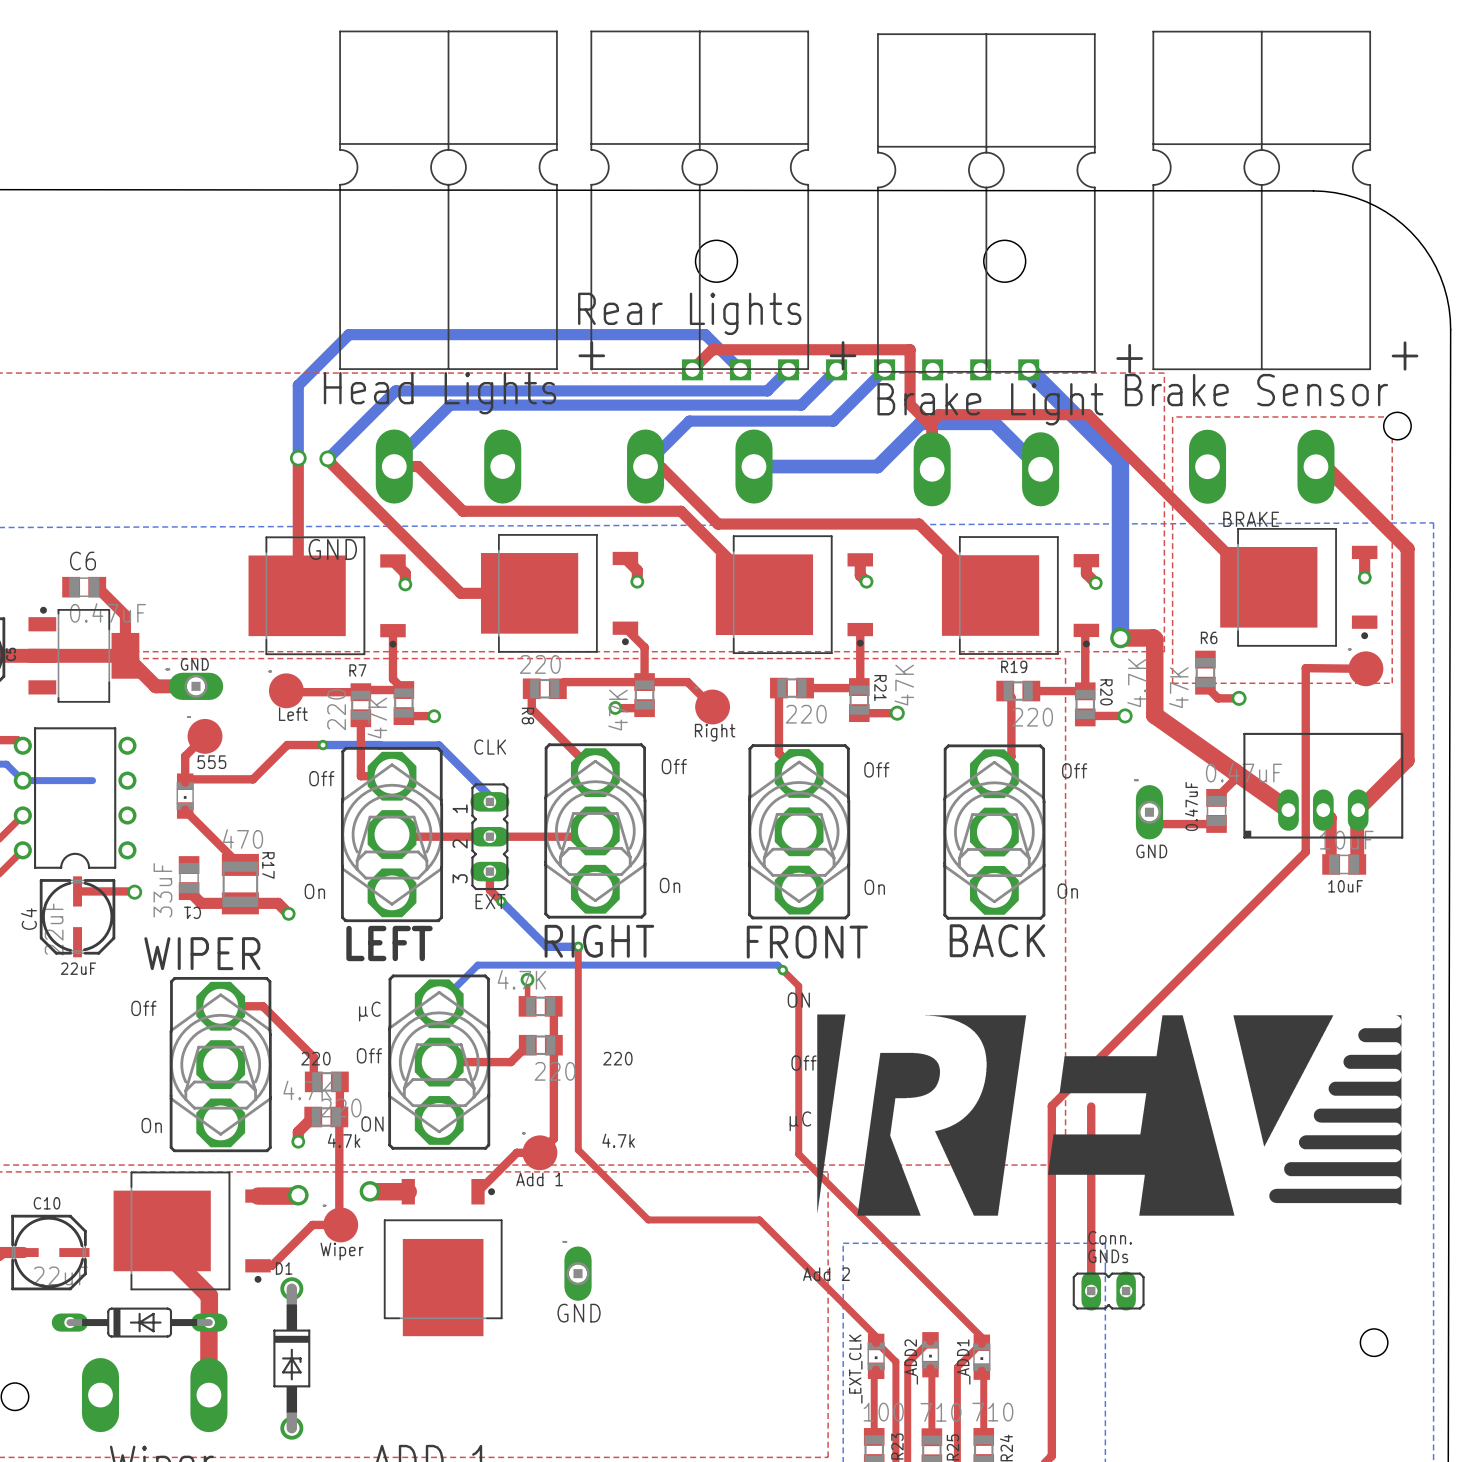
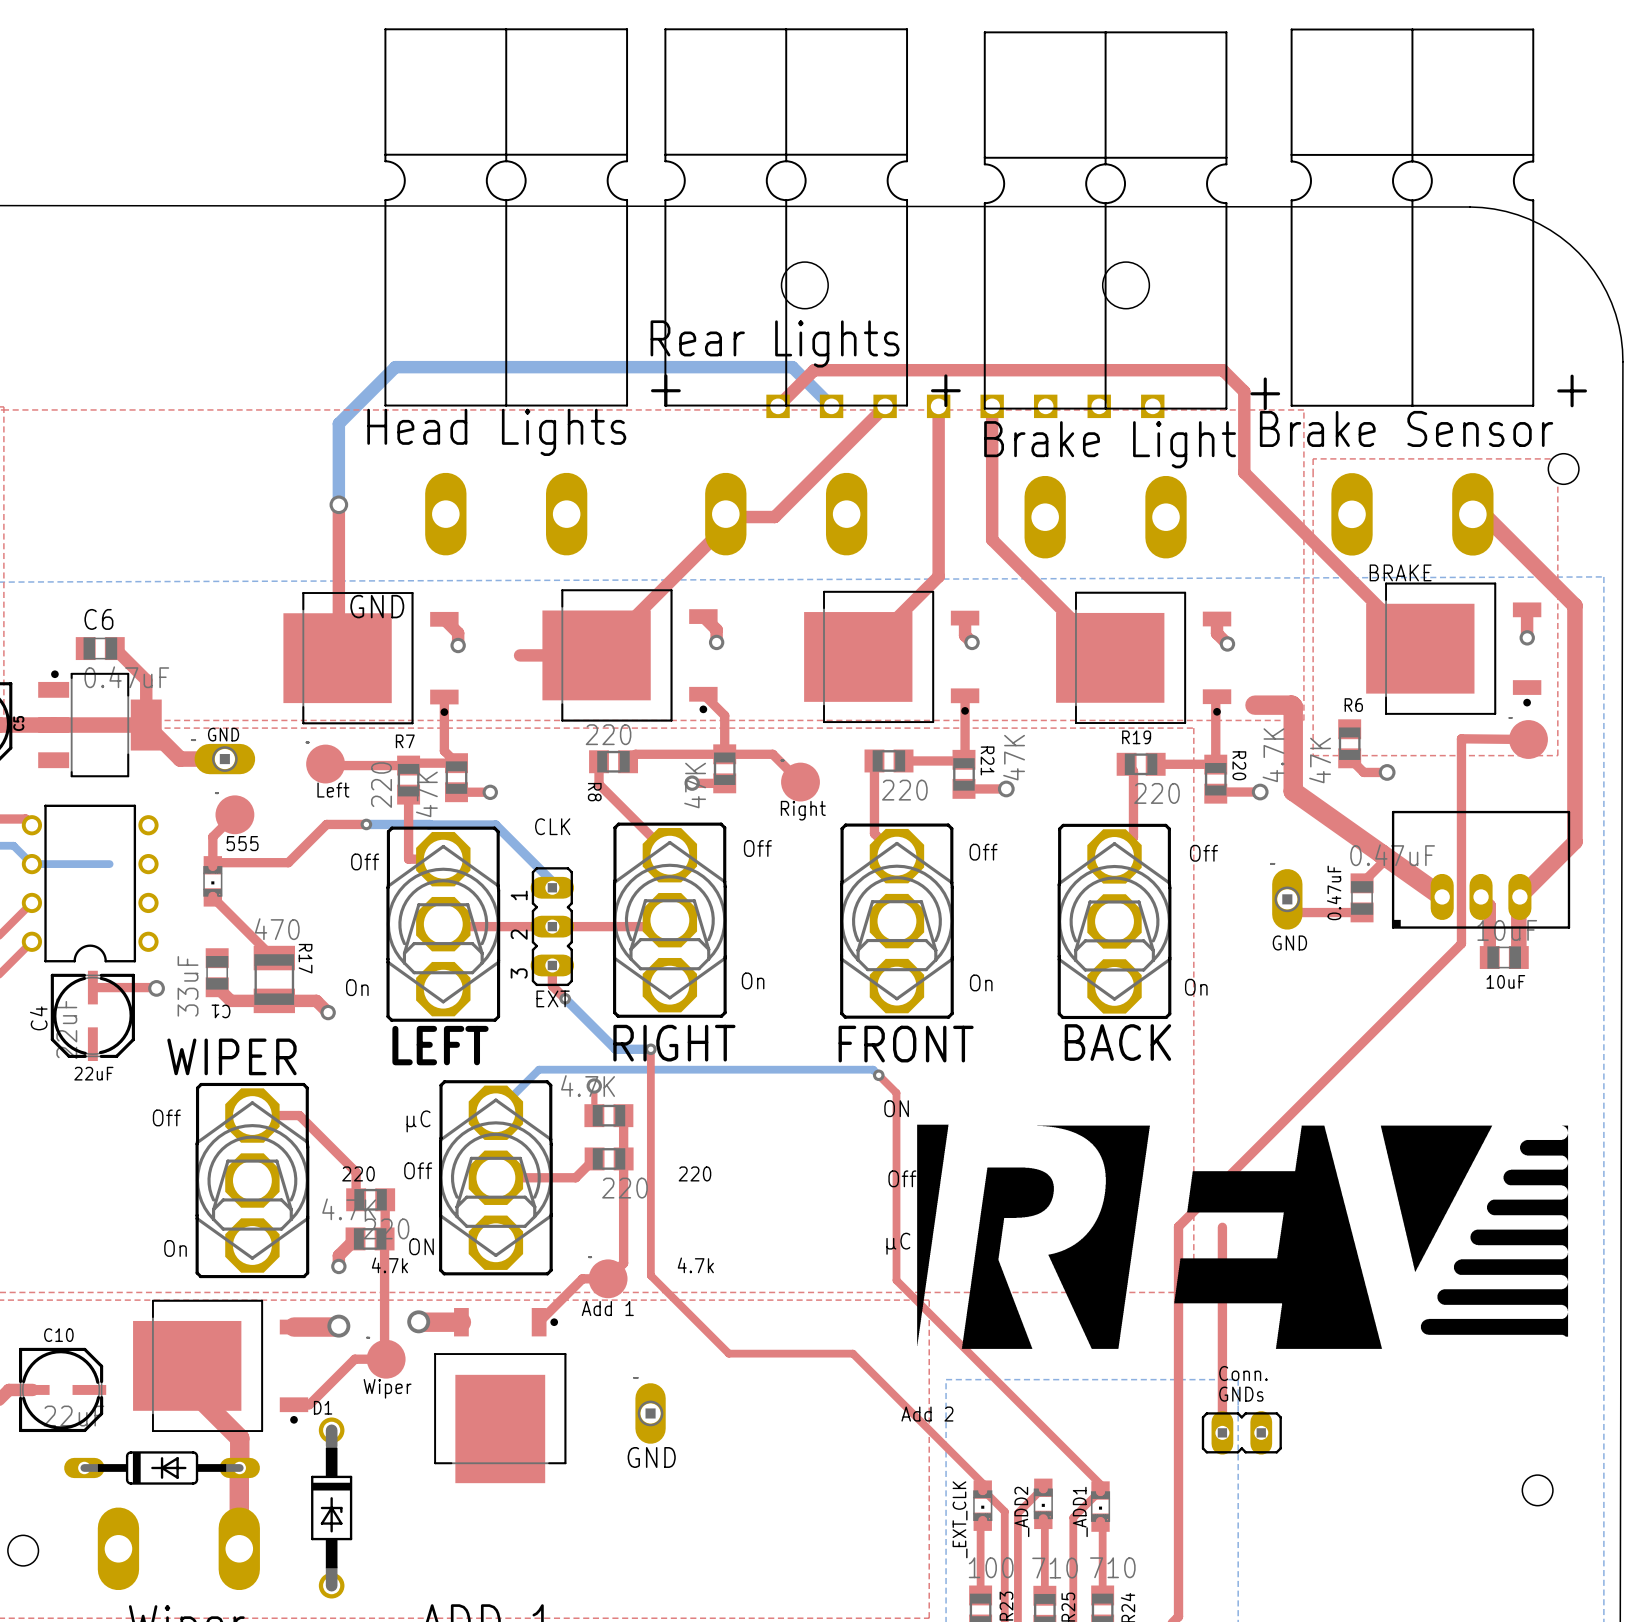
top track: (712, 349) (910, 349) (910, 404) (932, 426) -> none
bottom track: (788, 369) (767, 390) (395, 390) (327, 458) -> none
bottom track: (836, 369) (801, 405) (450, 405) (394, 460) (394, 466) -> none
bottom track: (884, 369) (833, 421) (689, 421) (645, 466) -> none
bottom track: (1028, 369) (1120, 461) (1120, 637) -> none
top track: none -> (885, 406) (774, 517) (734, 517) (596, 655)
top track: (327, 458) (460, 593) -> none
via: (327, 458) -> none
top track: (394, 466) (418, 466) (463, 511) (680, 511) (764, 594) -> (938, 406) (938, 576) (858, 656)
top track: (645, 466) (661, 467) (717, 524) (919, 524) -> (992, 406) (992, 539) (1030, 578)
bottom track: (753, 466) (877, 466) (920, 423) (994, 423) (1040, 469) -> none
top track: (932, 469) (932, 421) (938, 414) (1087, 414) (1260, 587) (1268, 587) -> (800, 383) (814, 370) (1222, 370) (1244, 391) (1244, 472) (1420, 648)
via: (1120, 637) -> none

